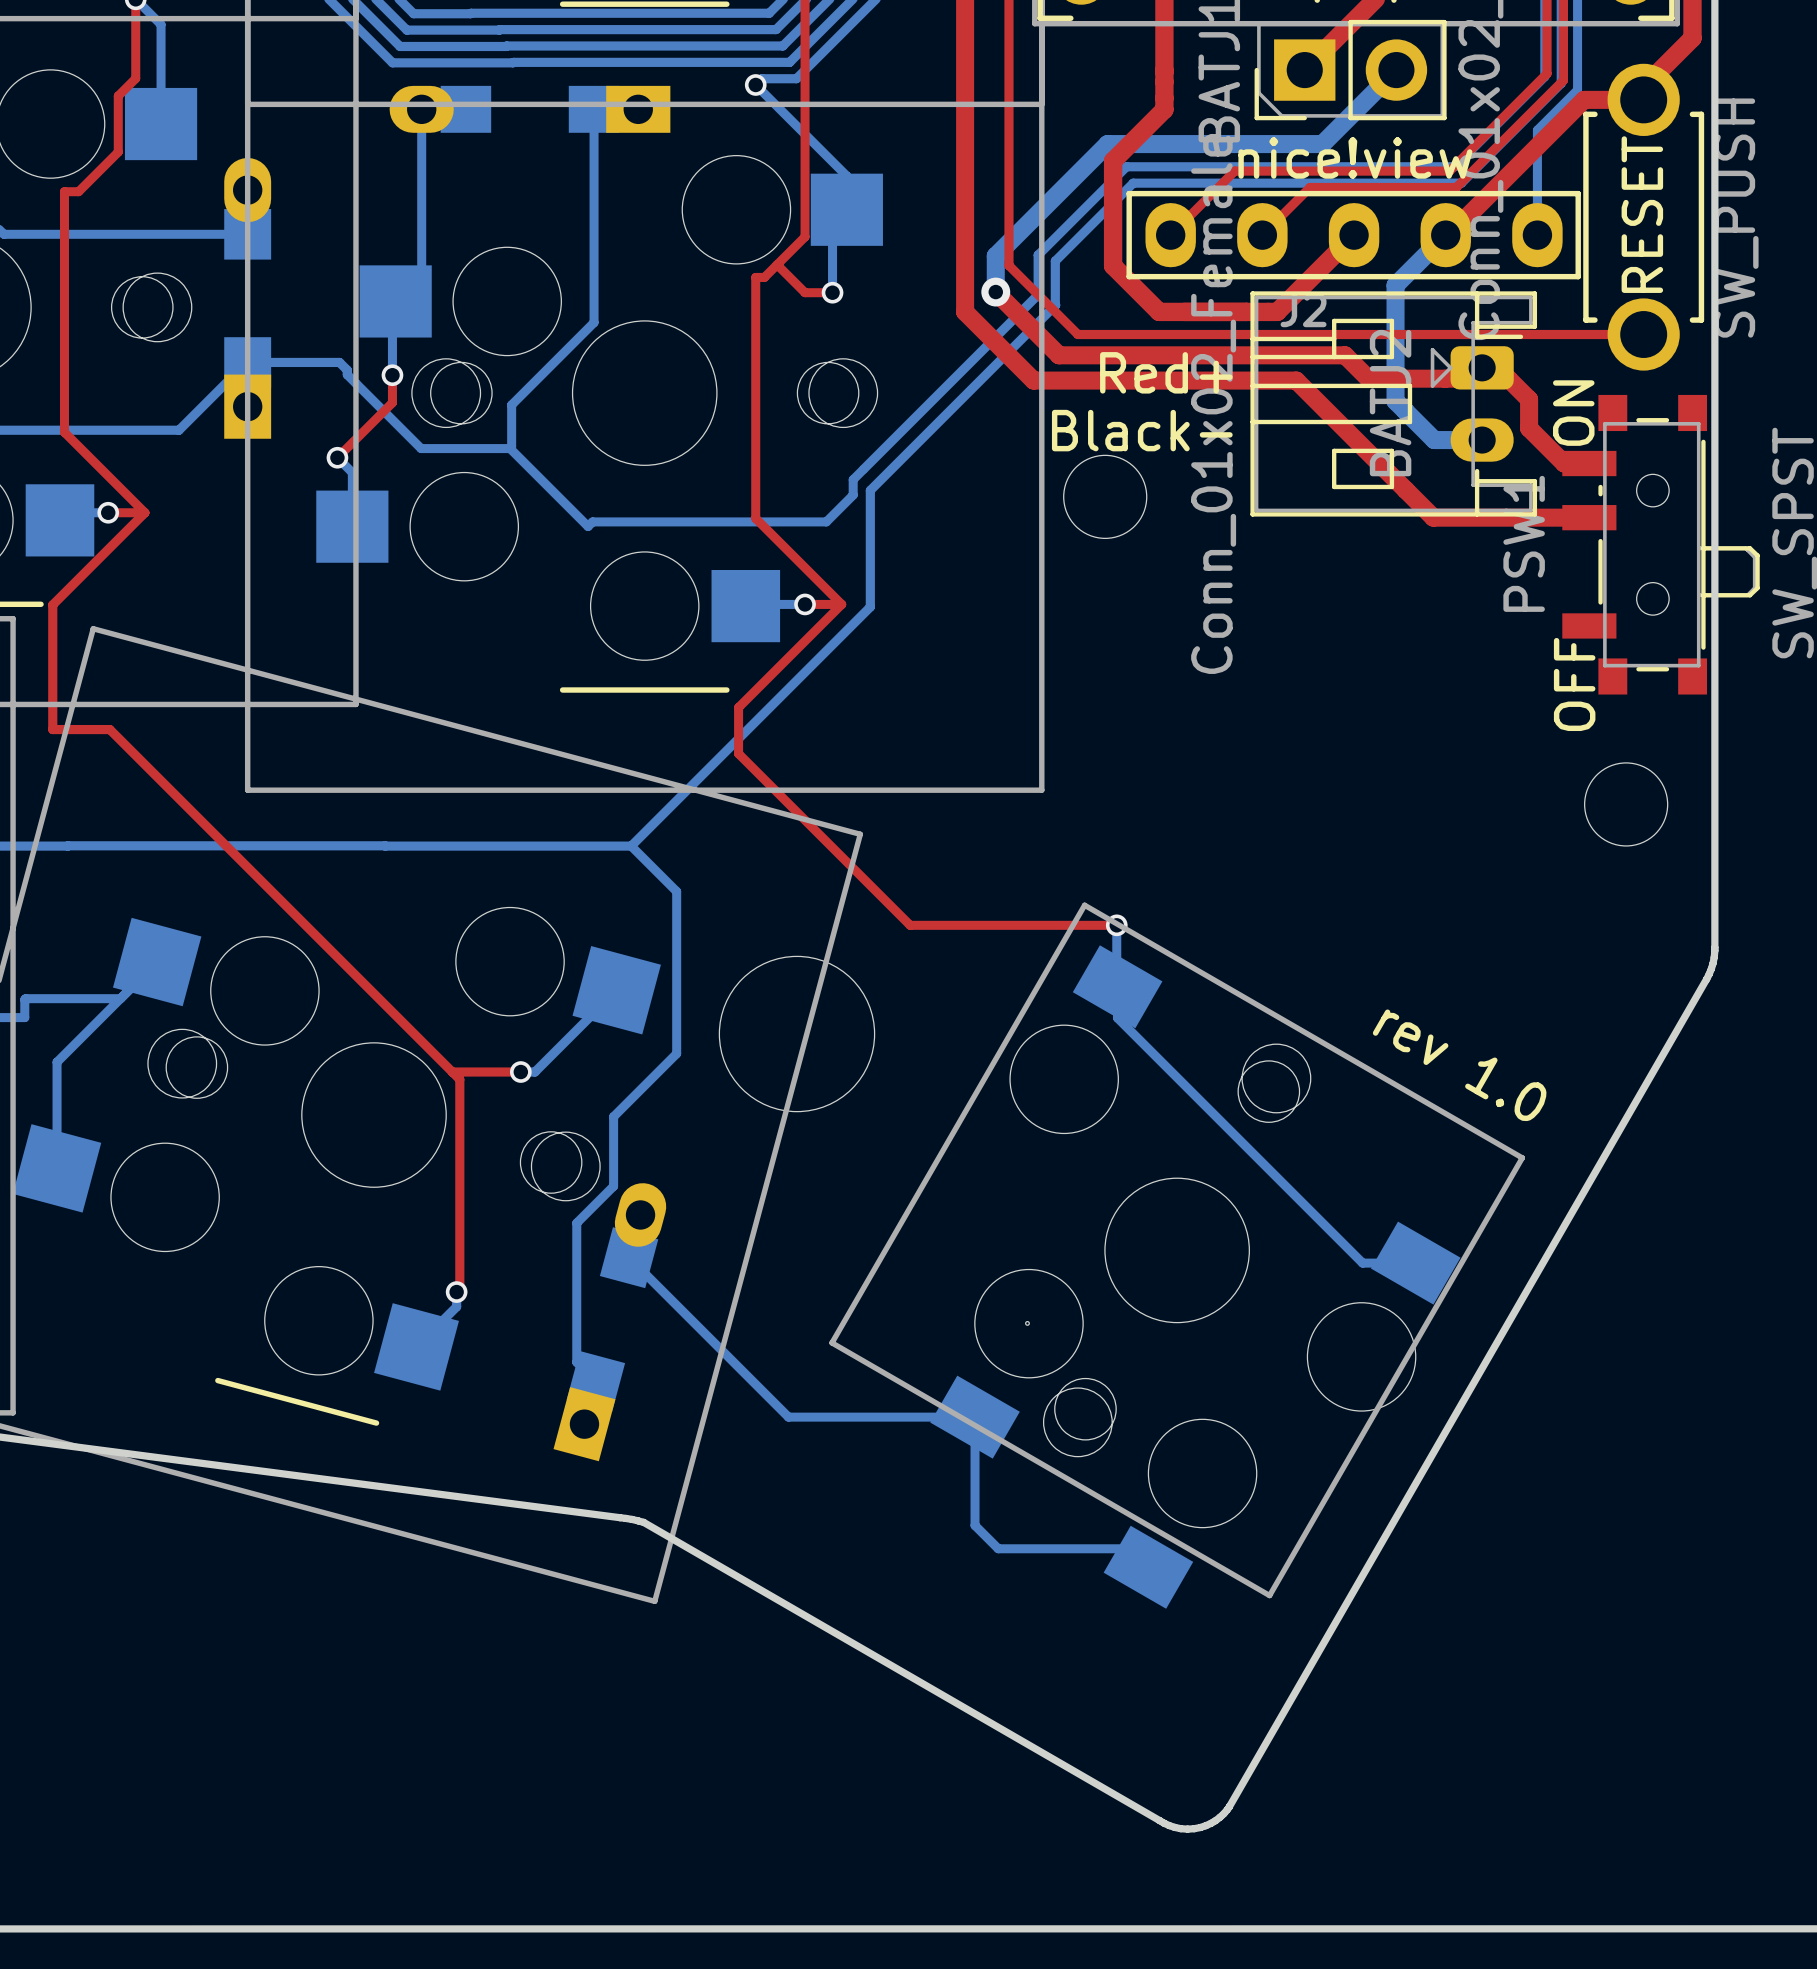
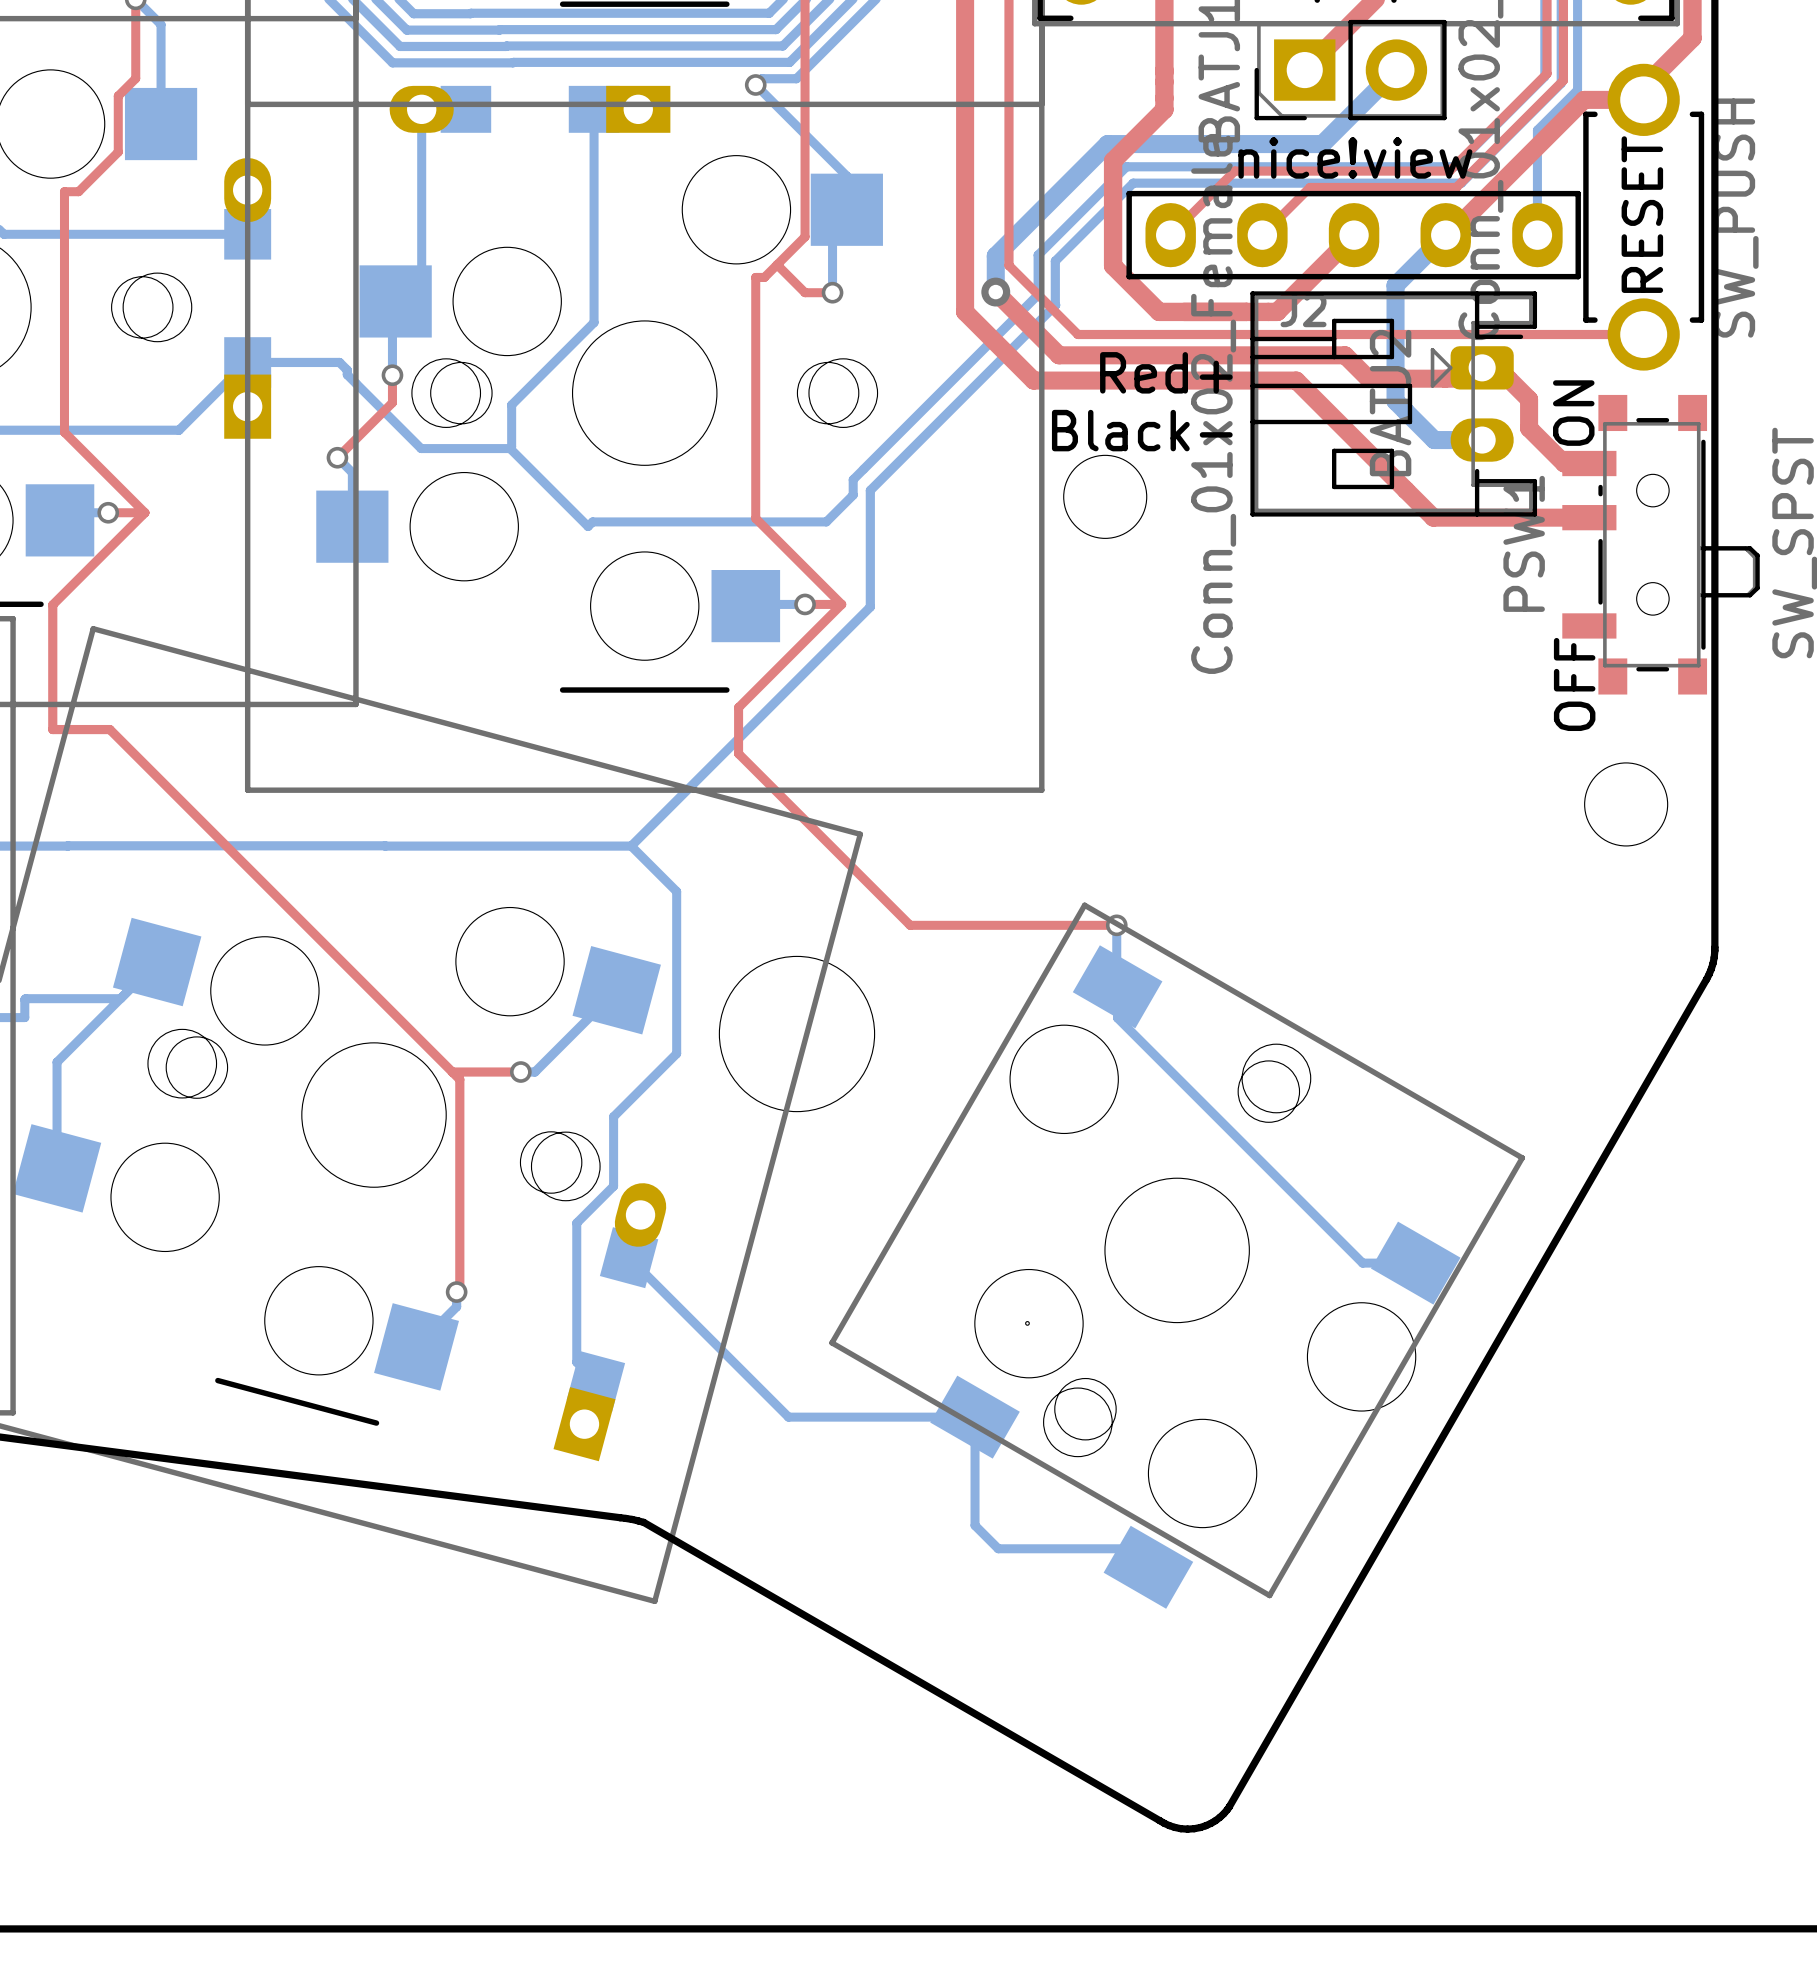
text: rev 1.0 (1459, 1065) -> none

